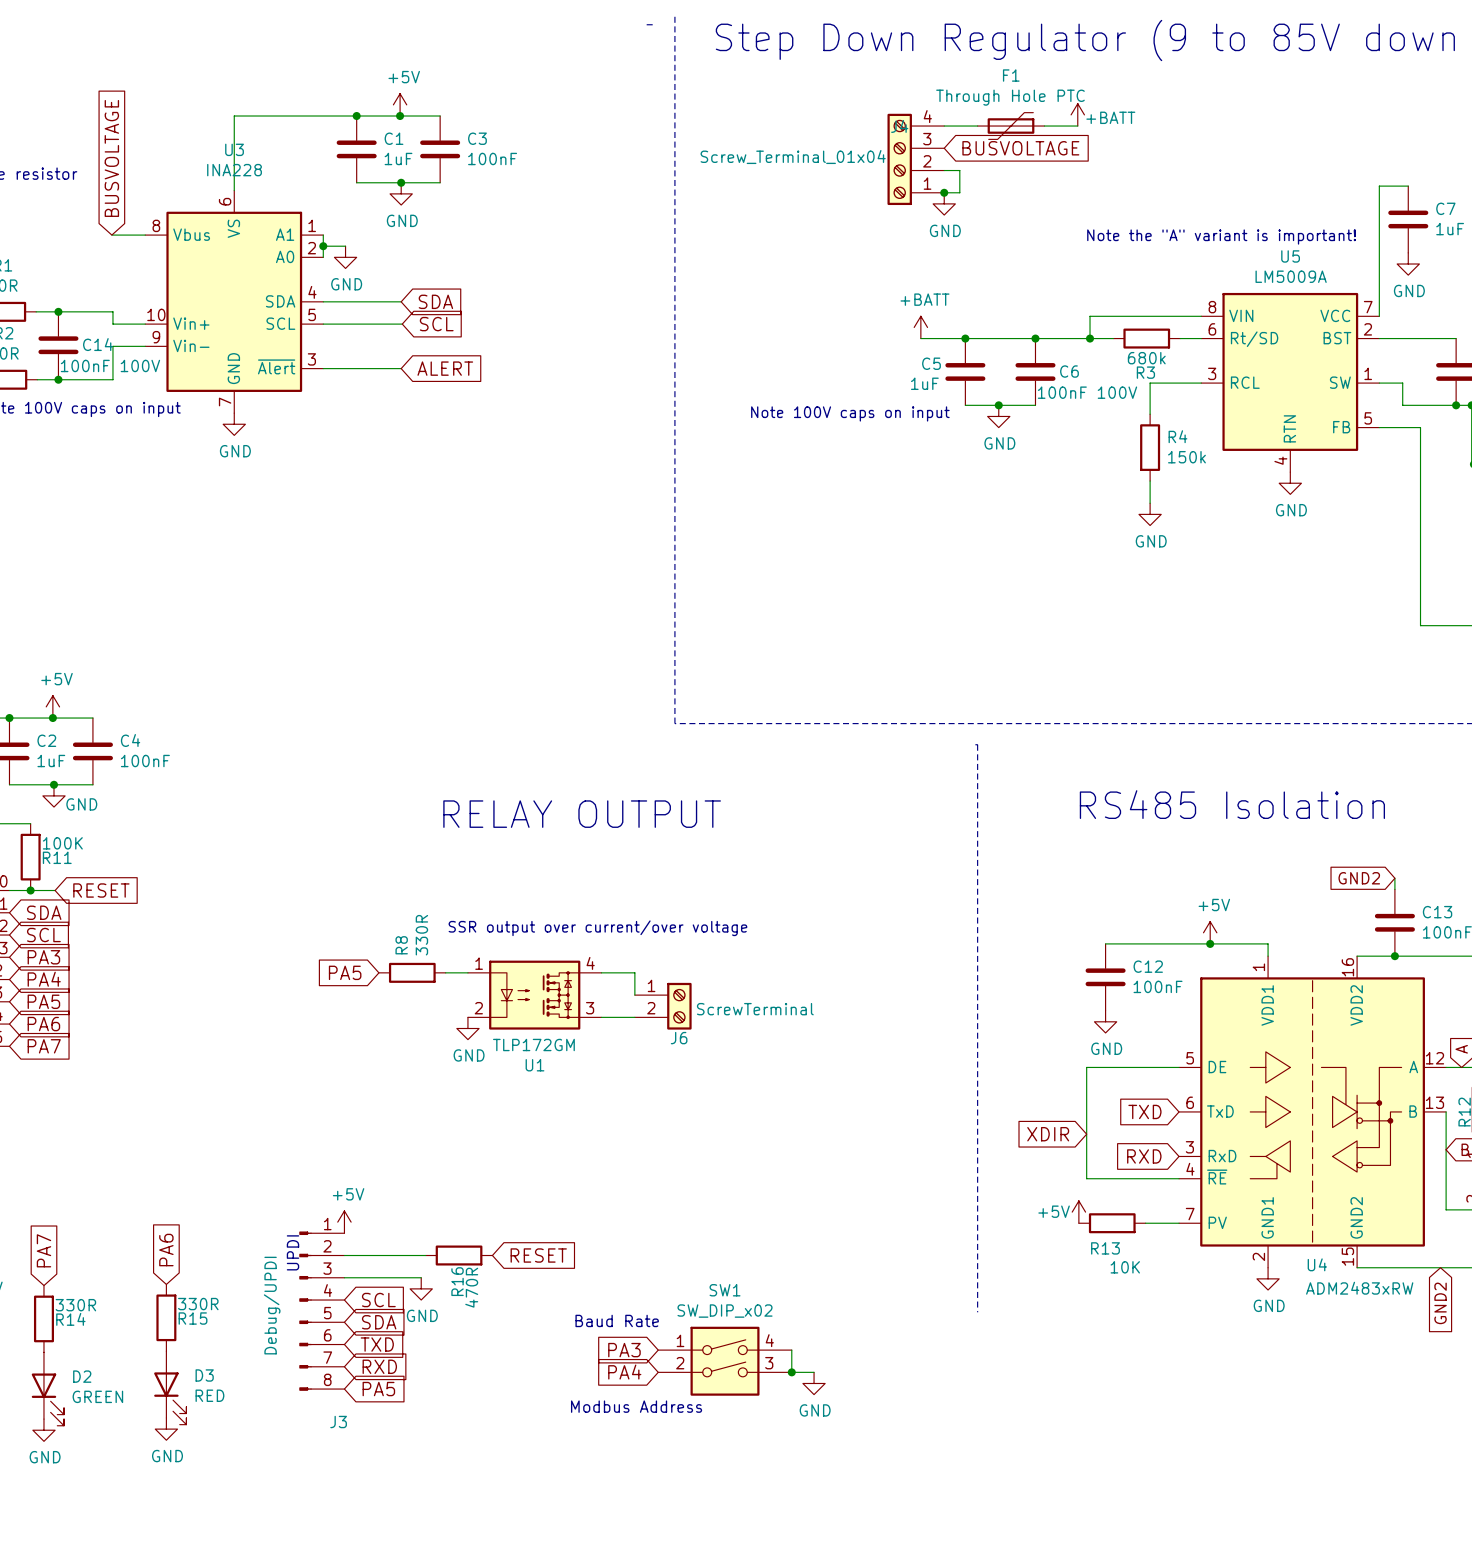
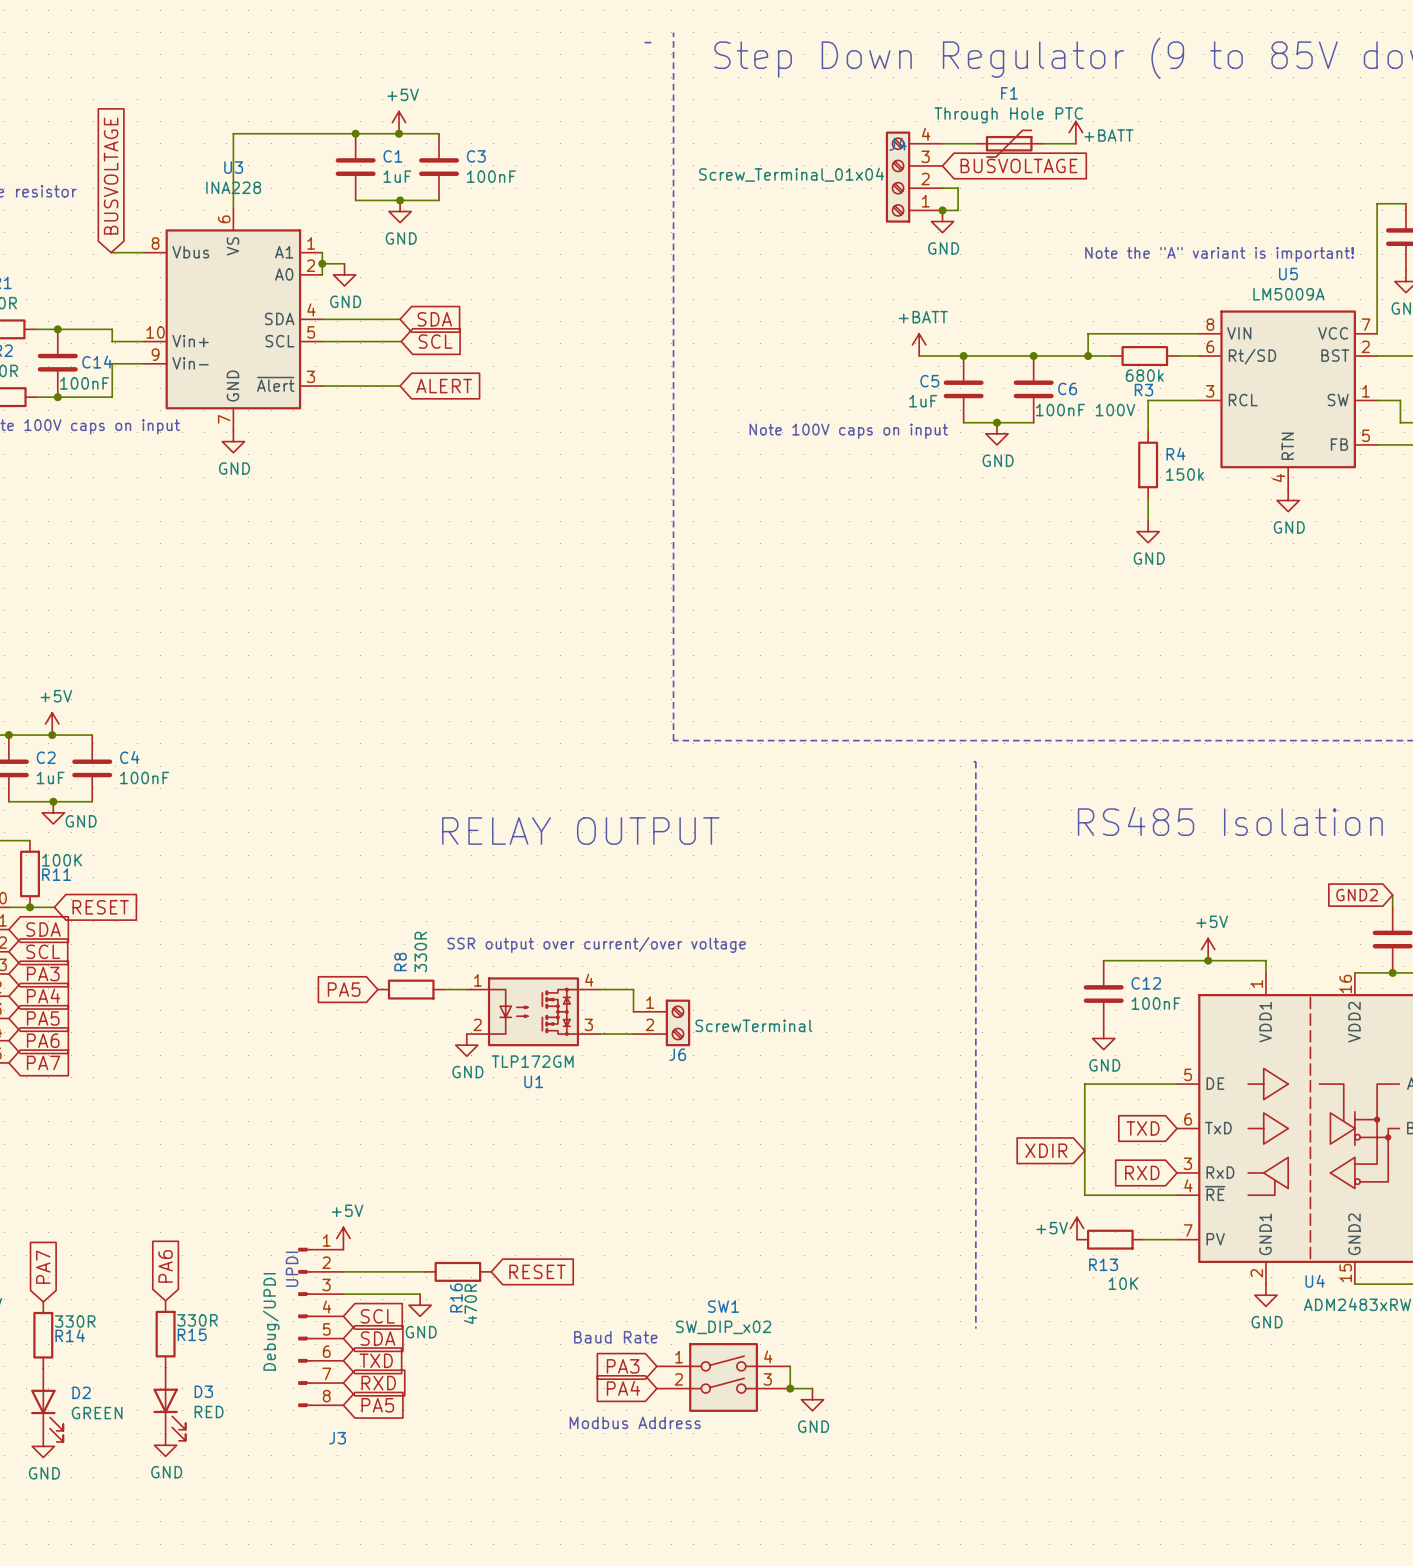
C14 value: 100nF 100V (110, 365) -> 100nF (84, 383)

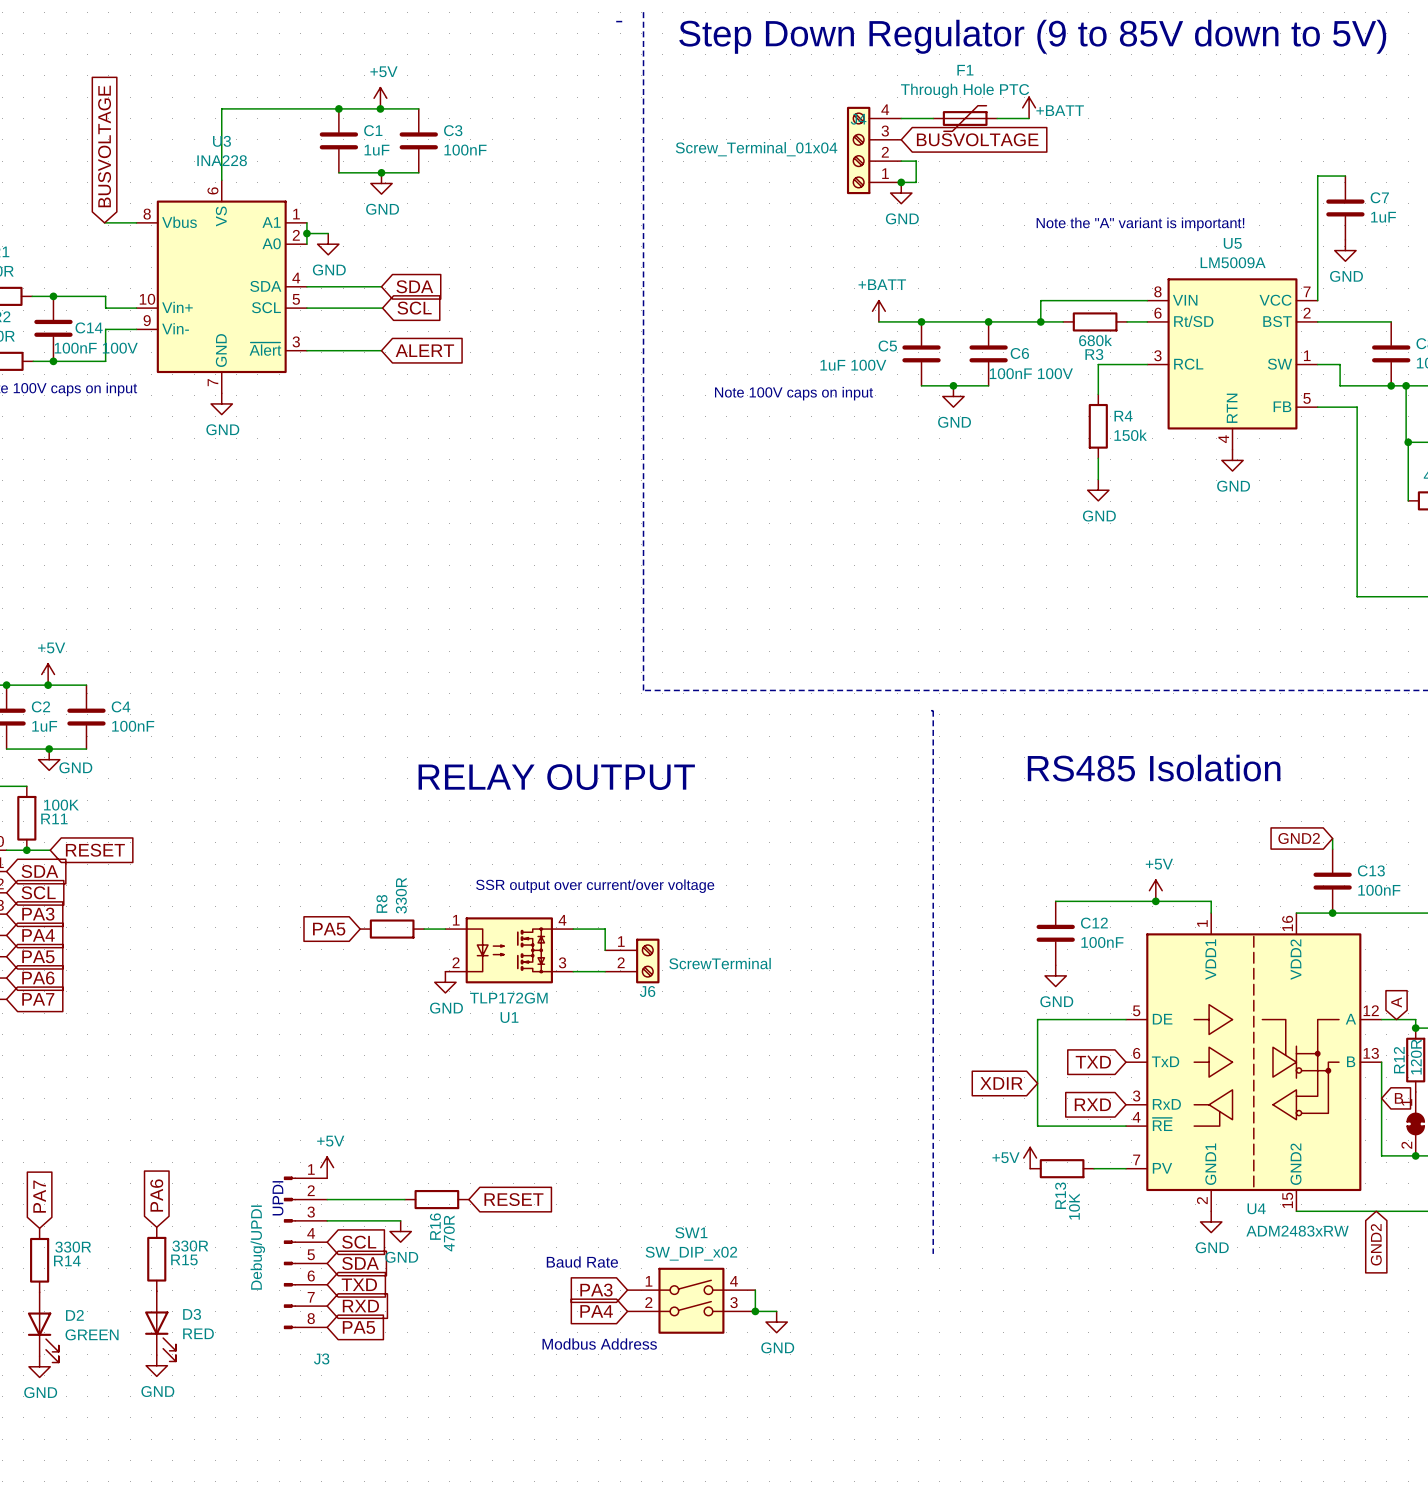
C14 value: 100nF (84, 383) -> 100nF 100V (96, 348)
C5 value: 1uF (923, 401) -> 1uF 100V (853, 365)
R13 name rotation: 0° (1103, 1264) -> 90° counterclockwise (1060, 1195)
R13 value rotation: 0° (1123, 1283) -> 90° counterclockwise (1074, 1206)

